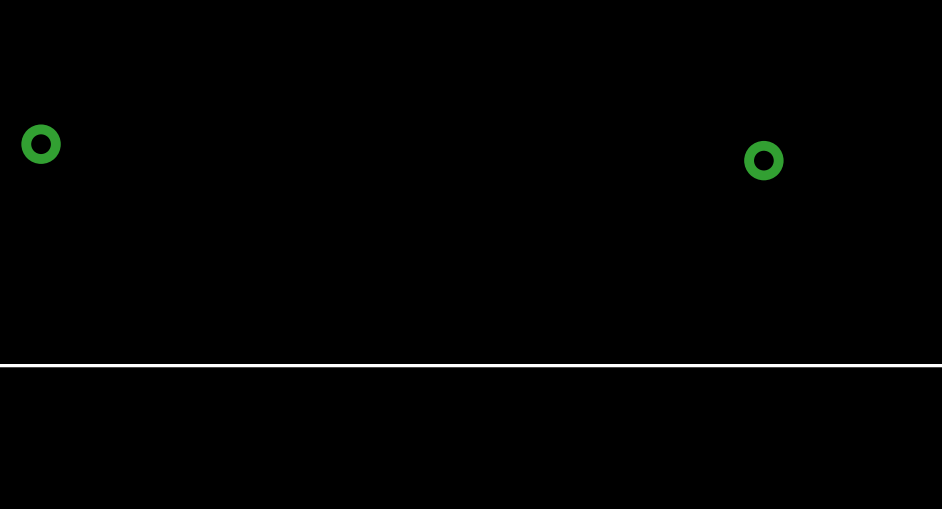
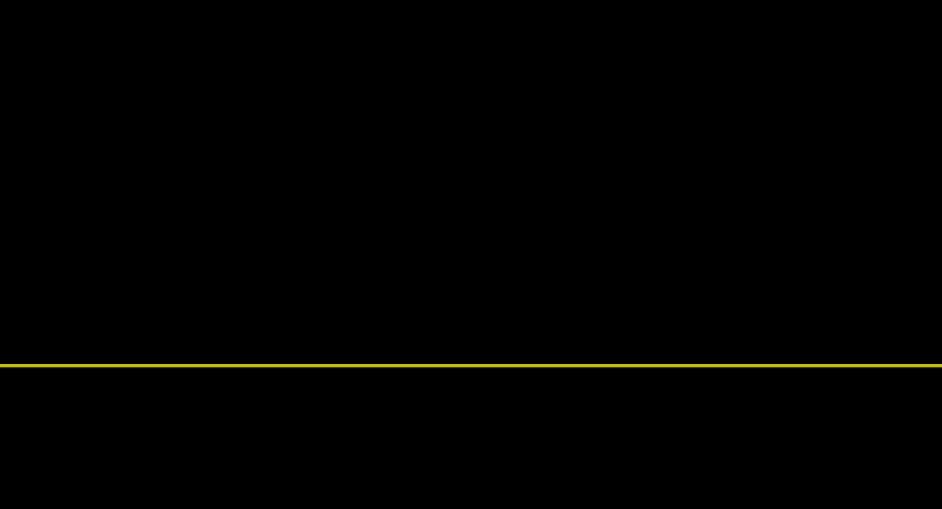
via: (41, 144) -> none
via: (763, 160) -> none

